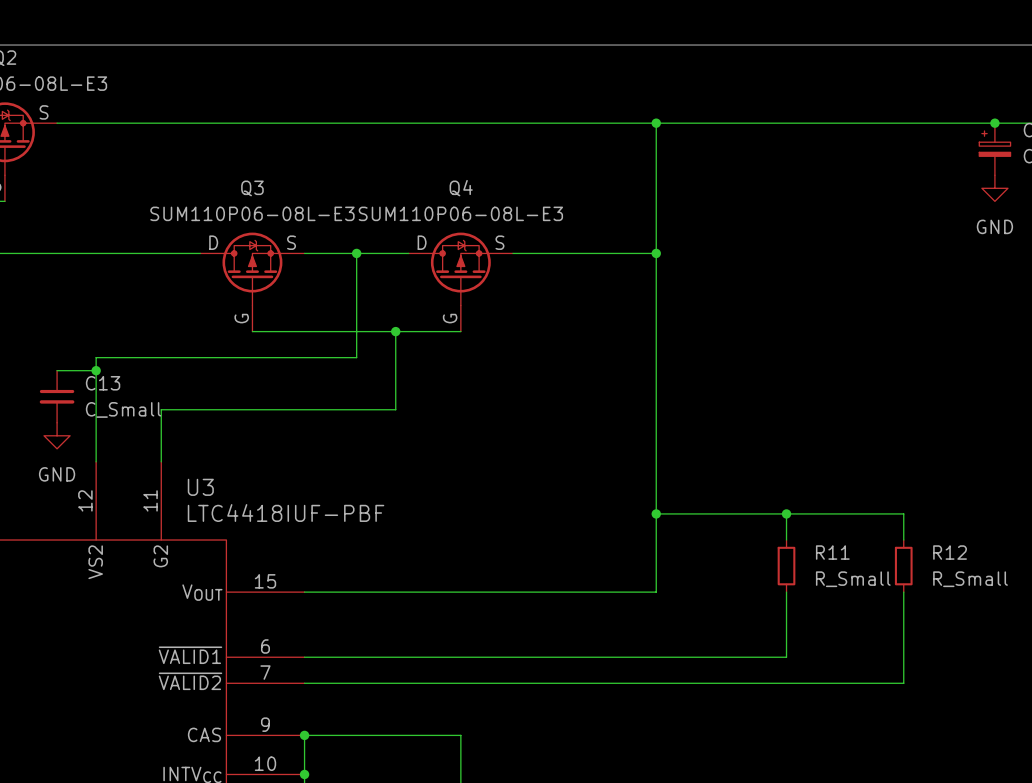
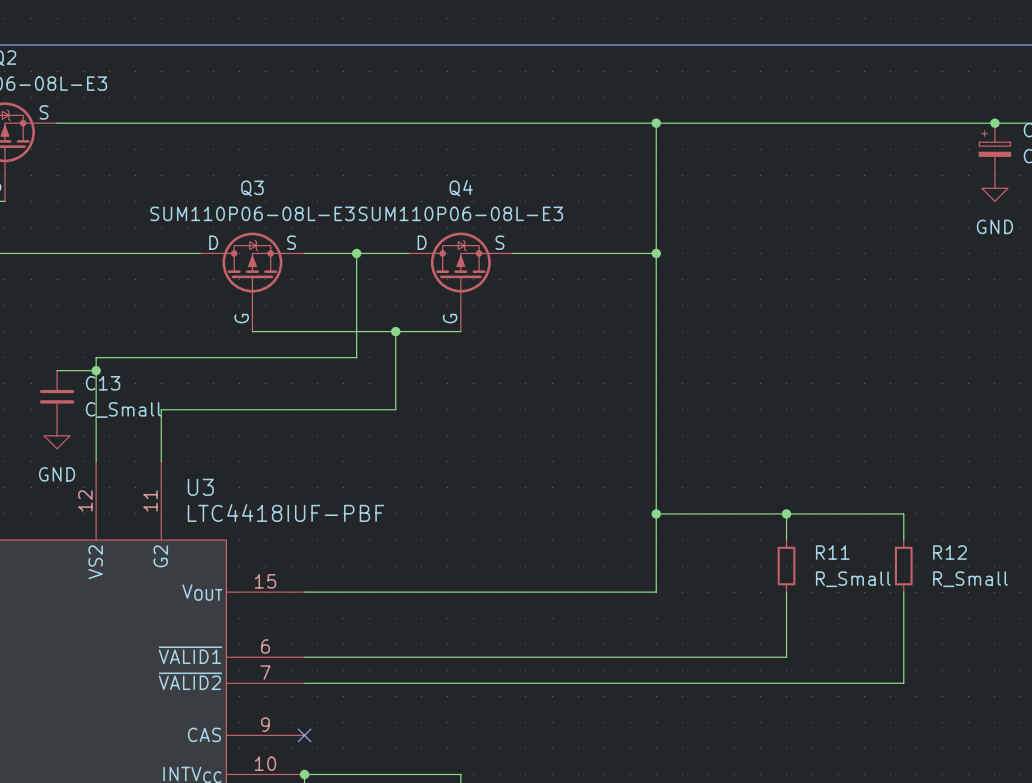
junction: (304, 735) -> none
no-connect mark: none -> (304, 735)
wire: (304, 774) (304, 735) (460, 735) (460, 774) -> (304, 774) (460, 774)

